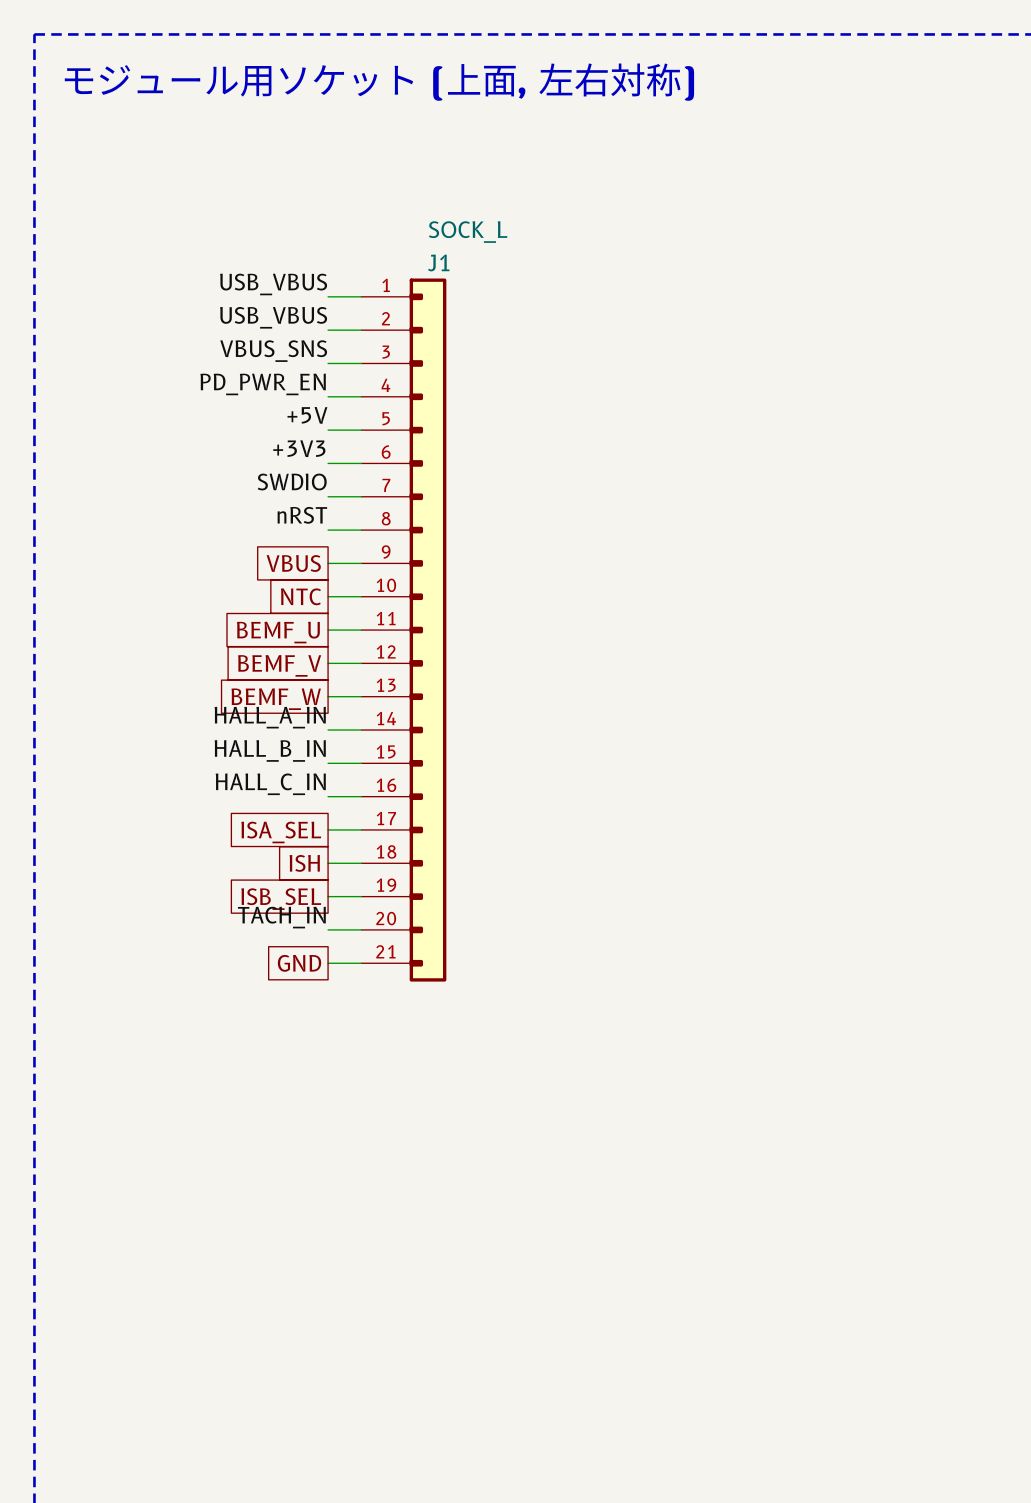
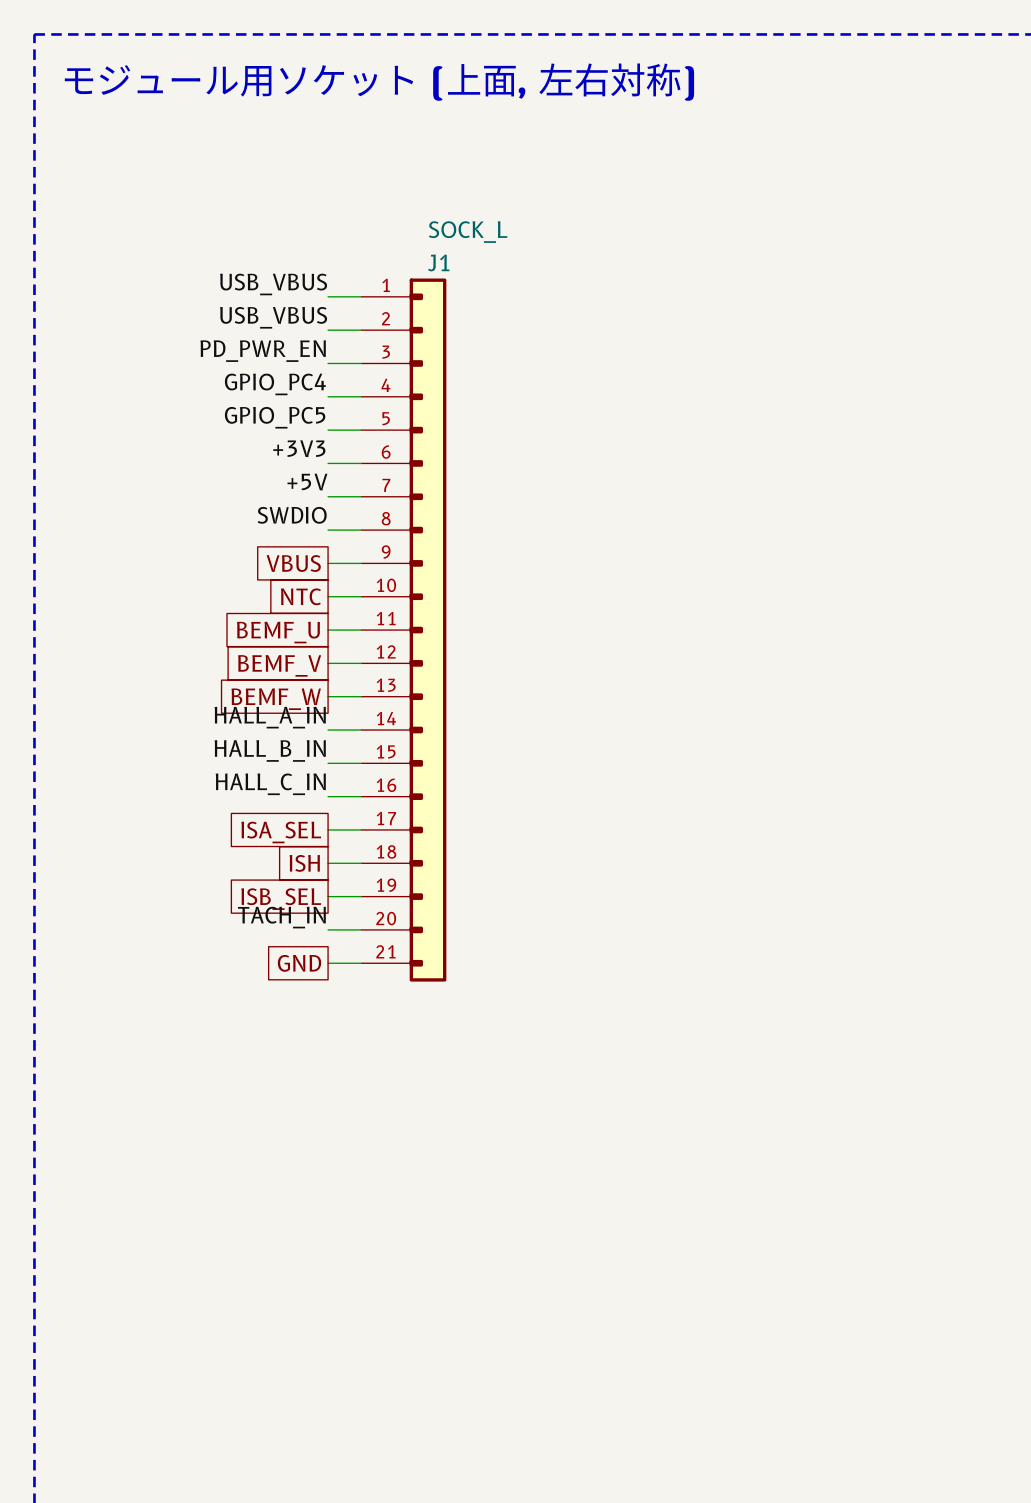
label: VBUS_SNS (273, 351) -> PD_PWR_EN (263, 351)
label: PD_PWR_EN (263, 384) -> GPIO_PC4 (275, 384)
label: +5V (307, 415) -> GPIO_PC5 (275, 417)
label: SWDIO (292, 481) -> +5V (307, 482)
label: nRST (302, 515) -> SWDIO (292, 515)

